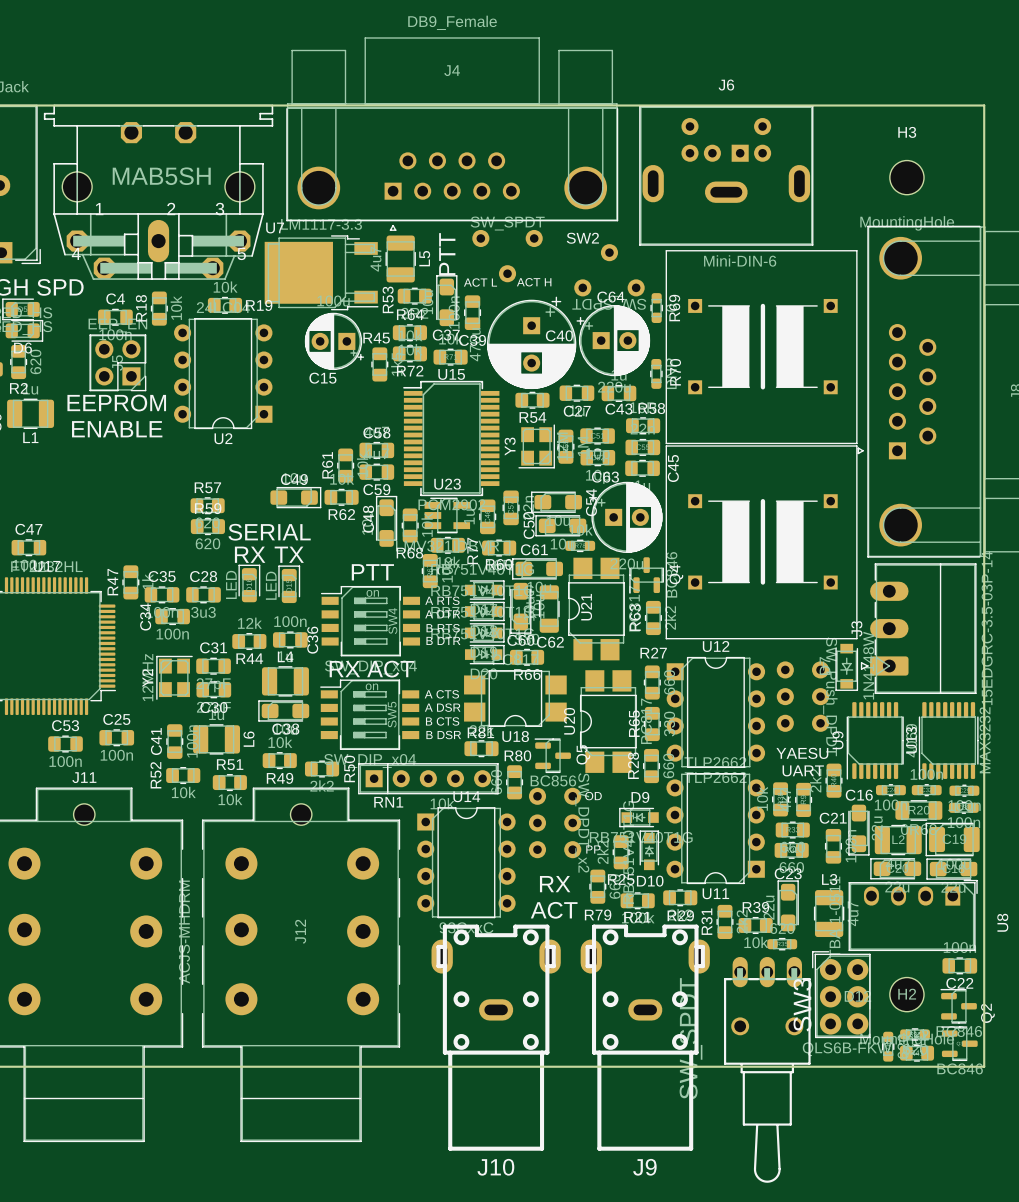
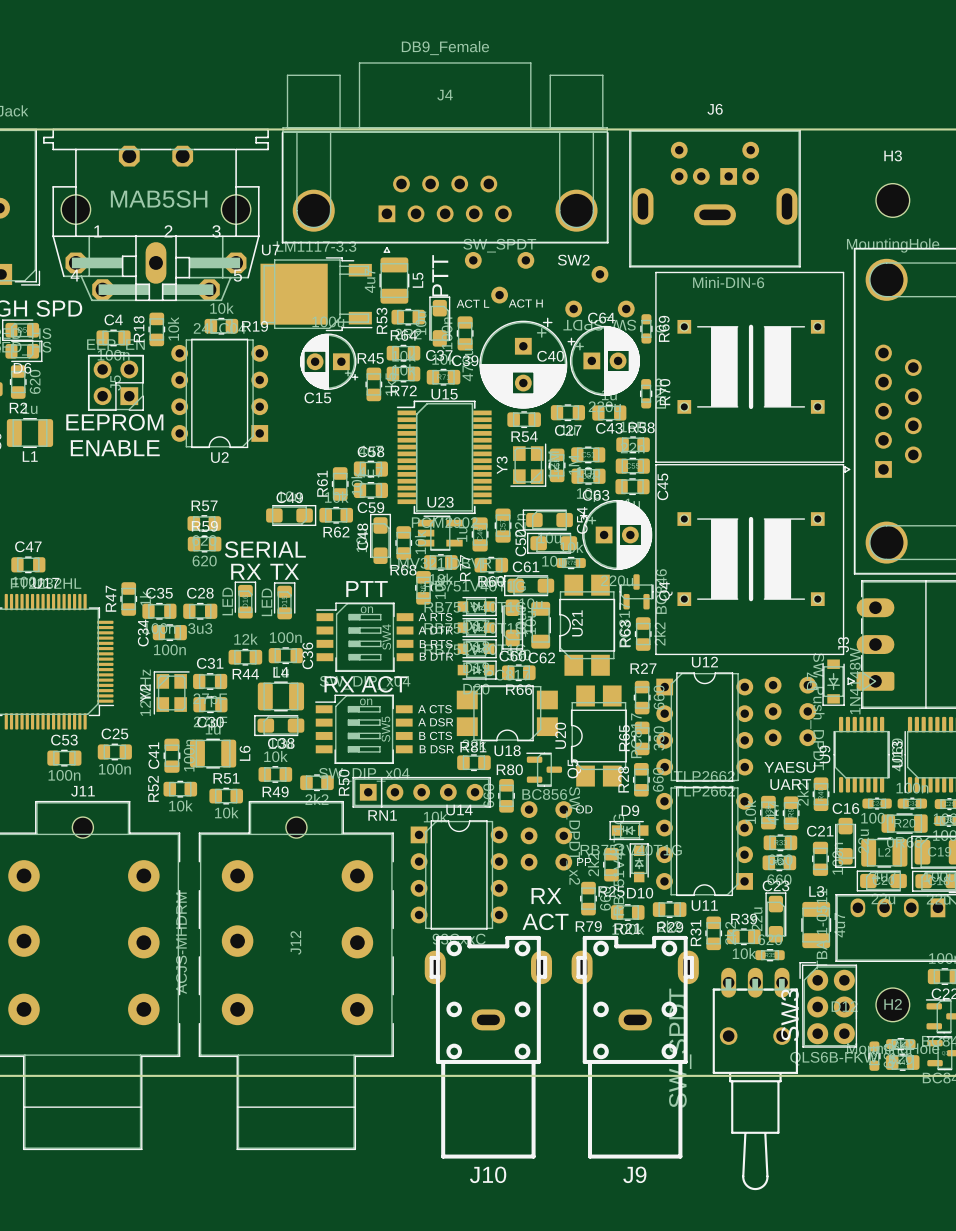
part footprint: [665, 250, 858, 445] -> [655, 271, 845, 463]
part footprint: [665, 445, 858, 640] -> [655, 464, 845, 656]

